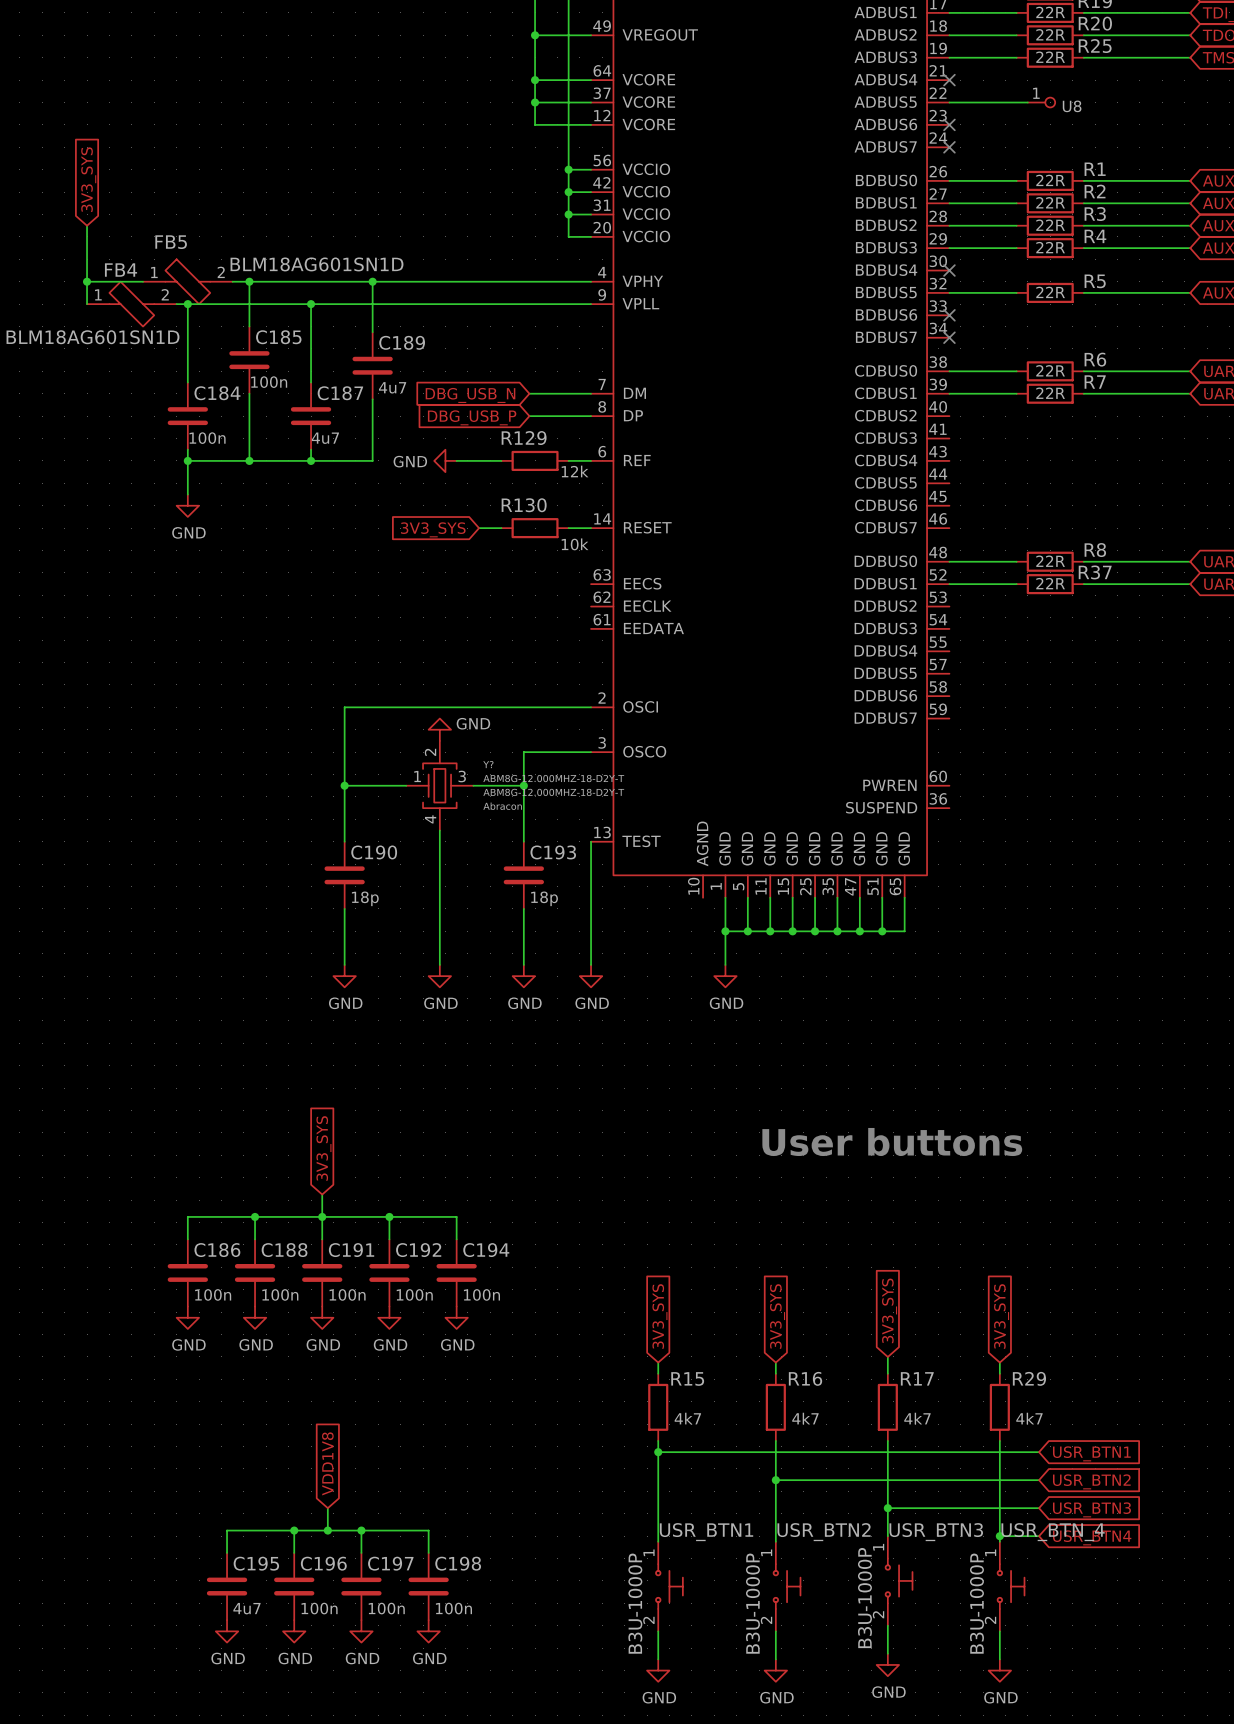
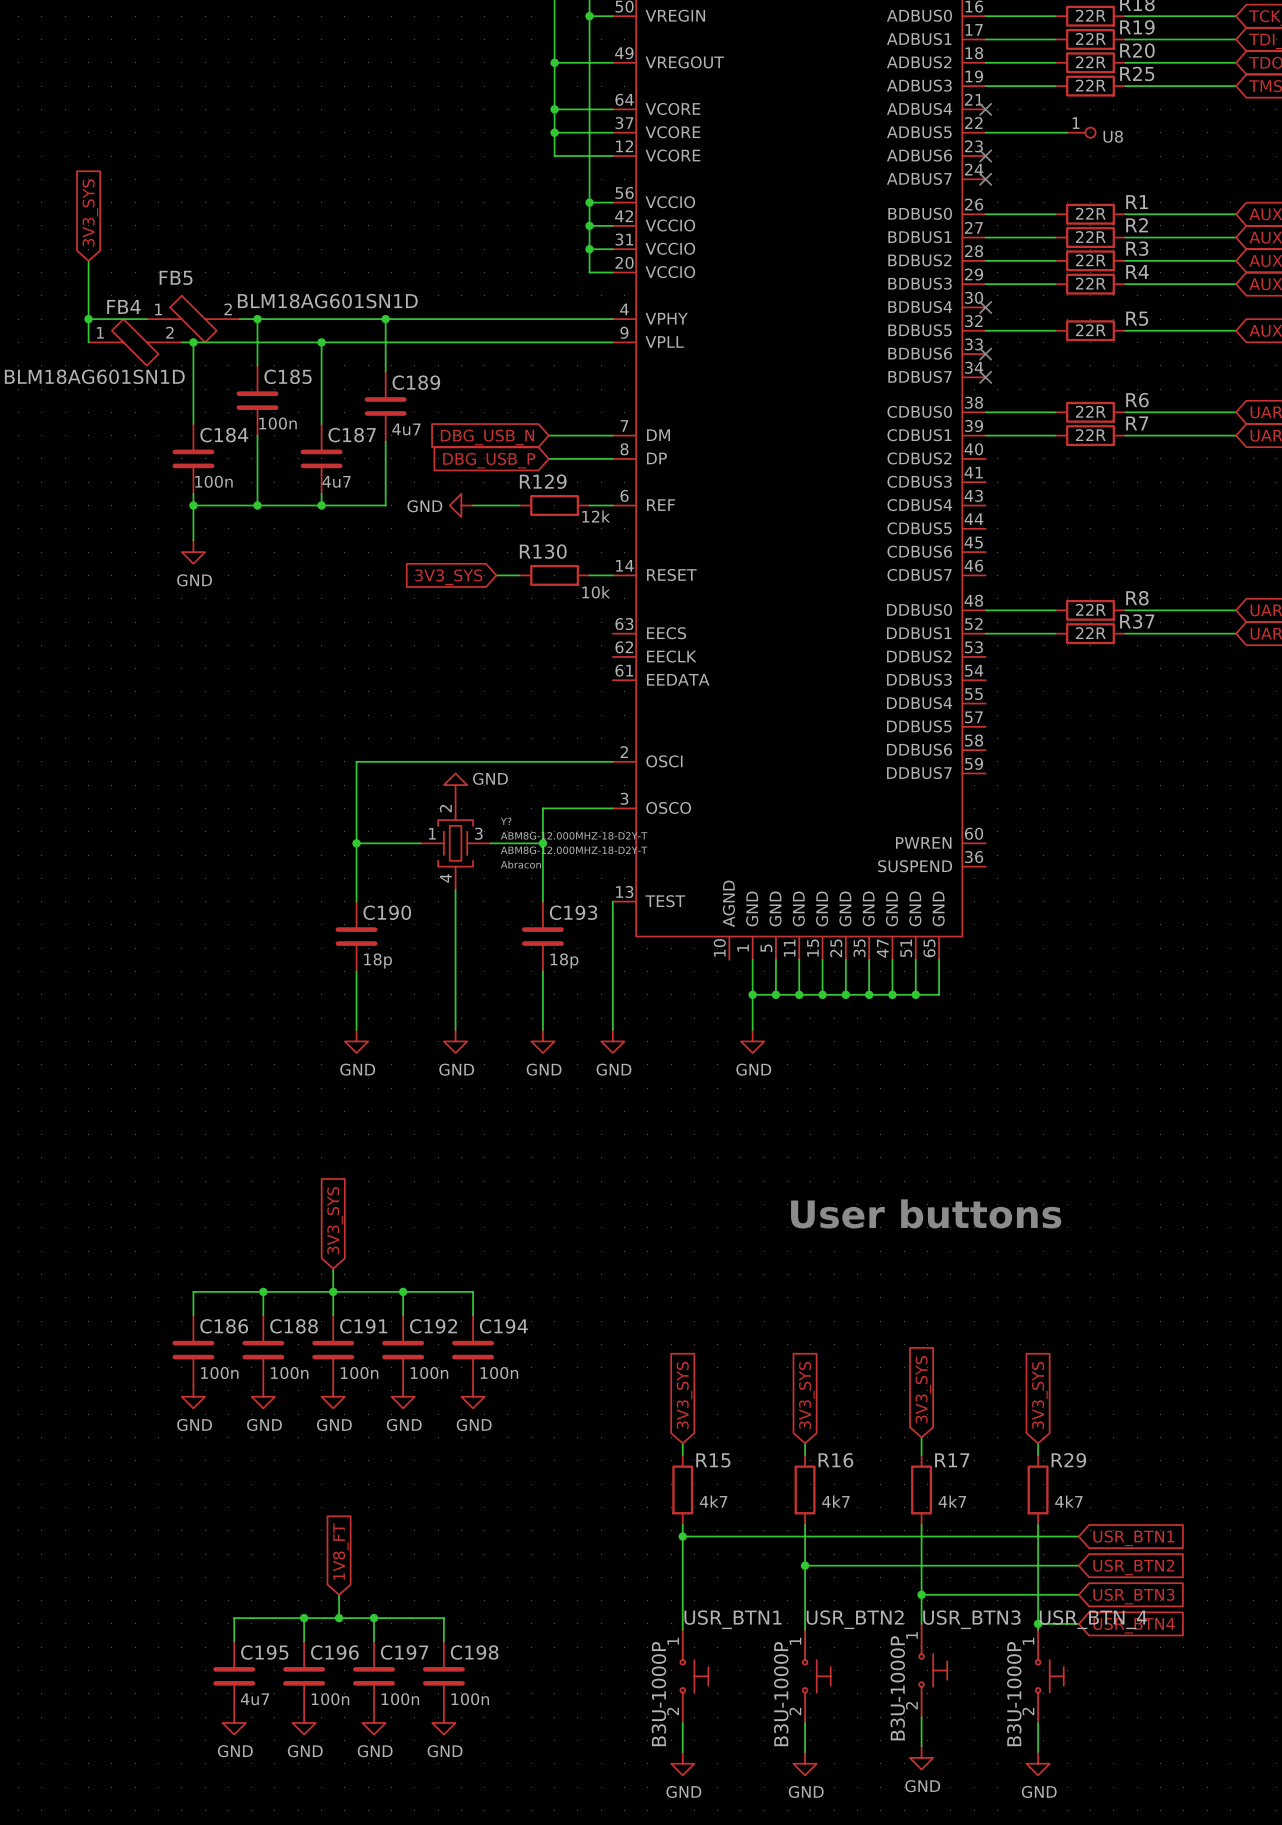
global label: VDD1V8 (327, 1463) -> 1V8_FT (340, 1551)

